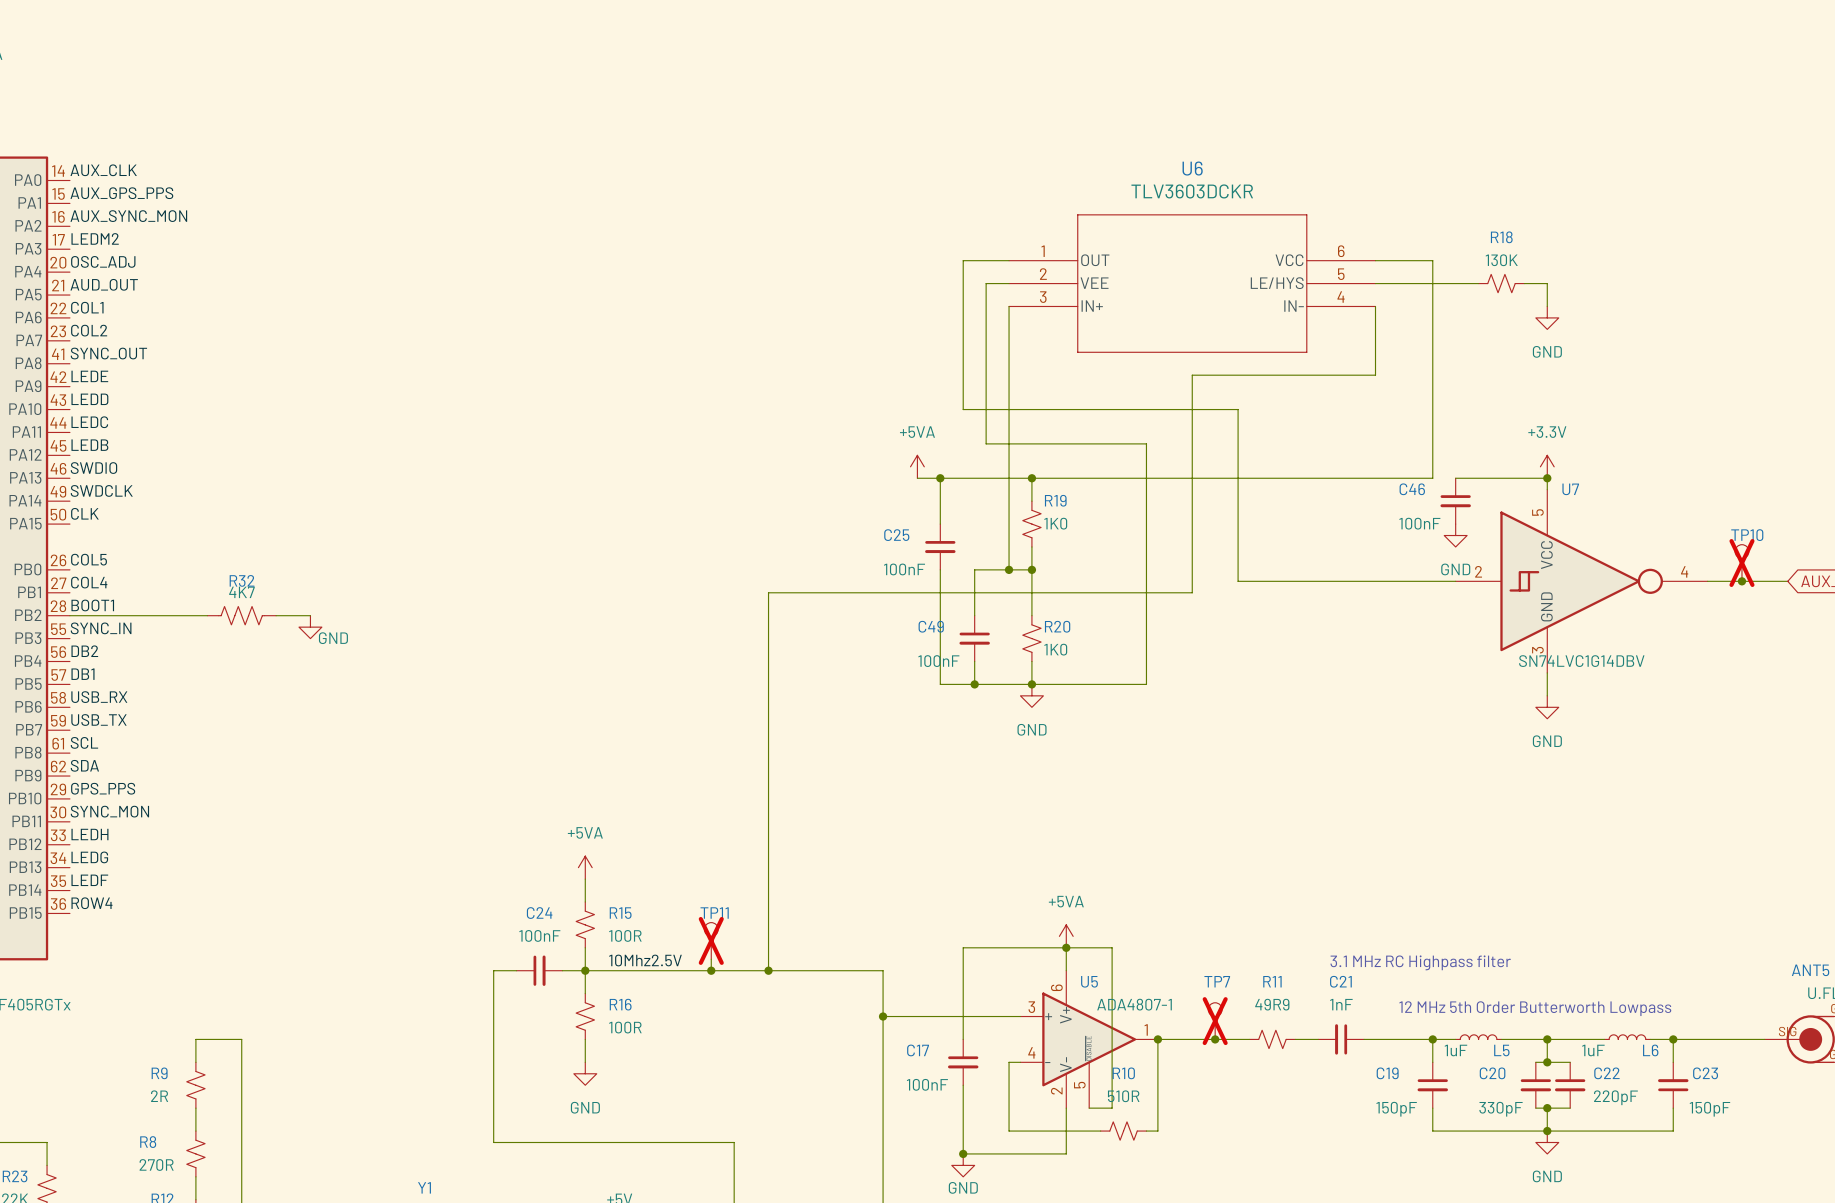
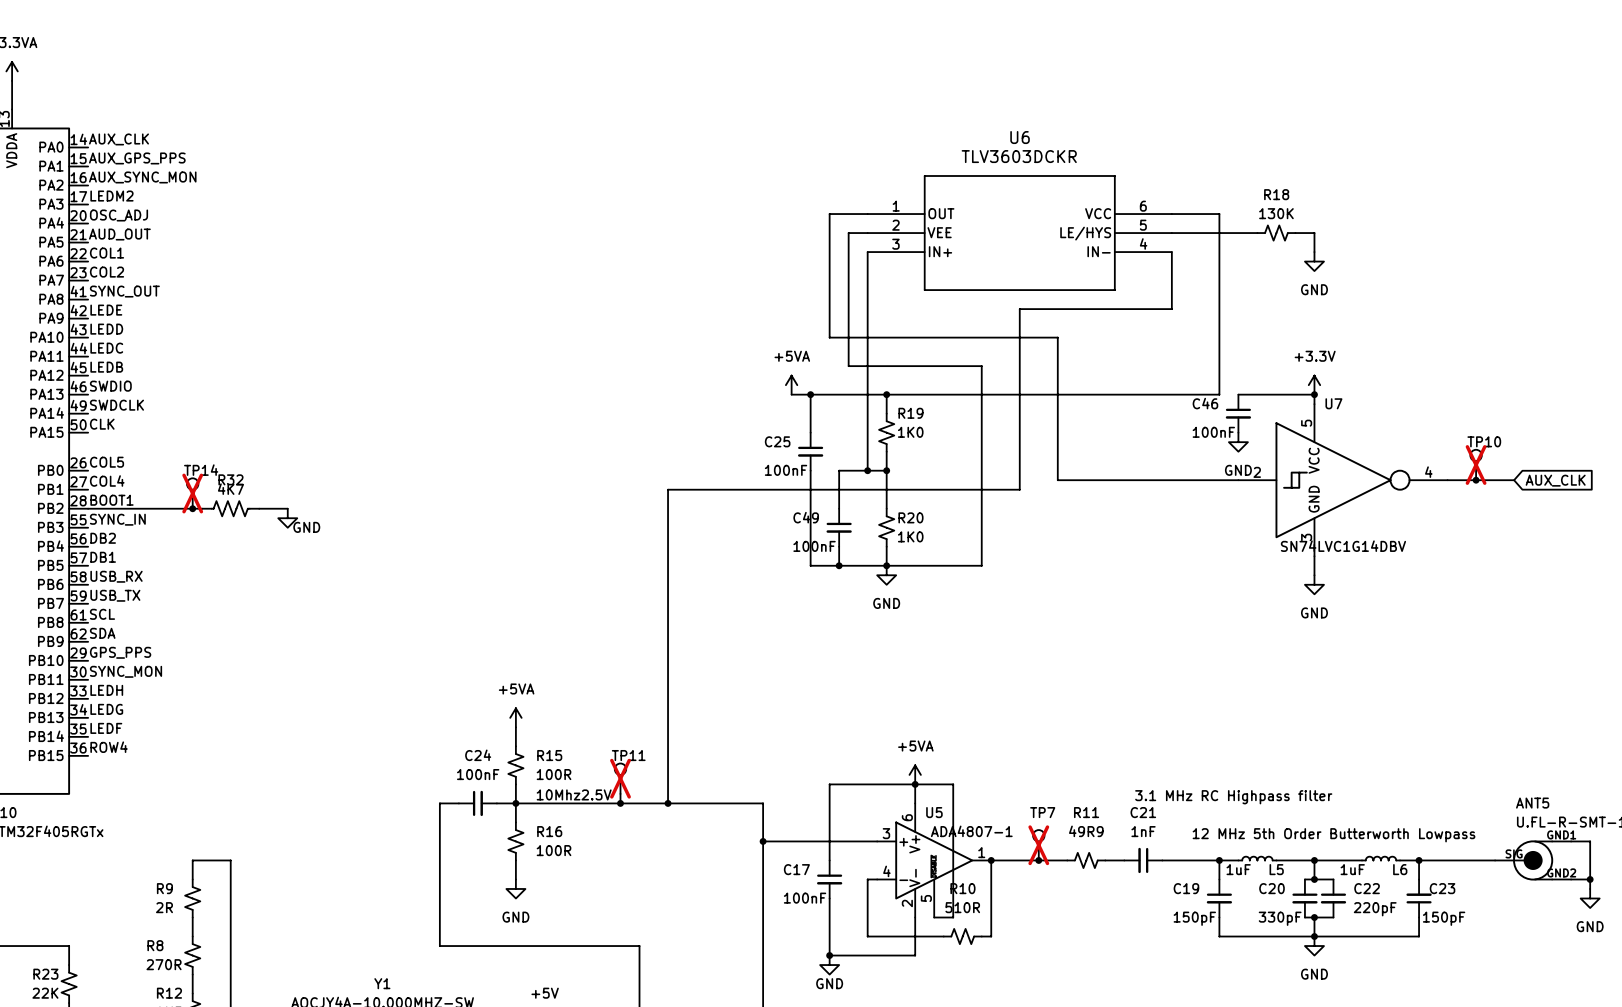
TP14: none -> (192, 493)
junction: none -> (192, 508)

